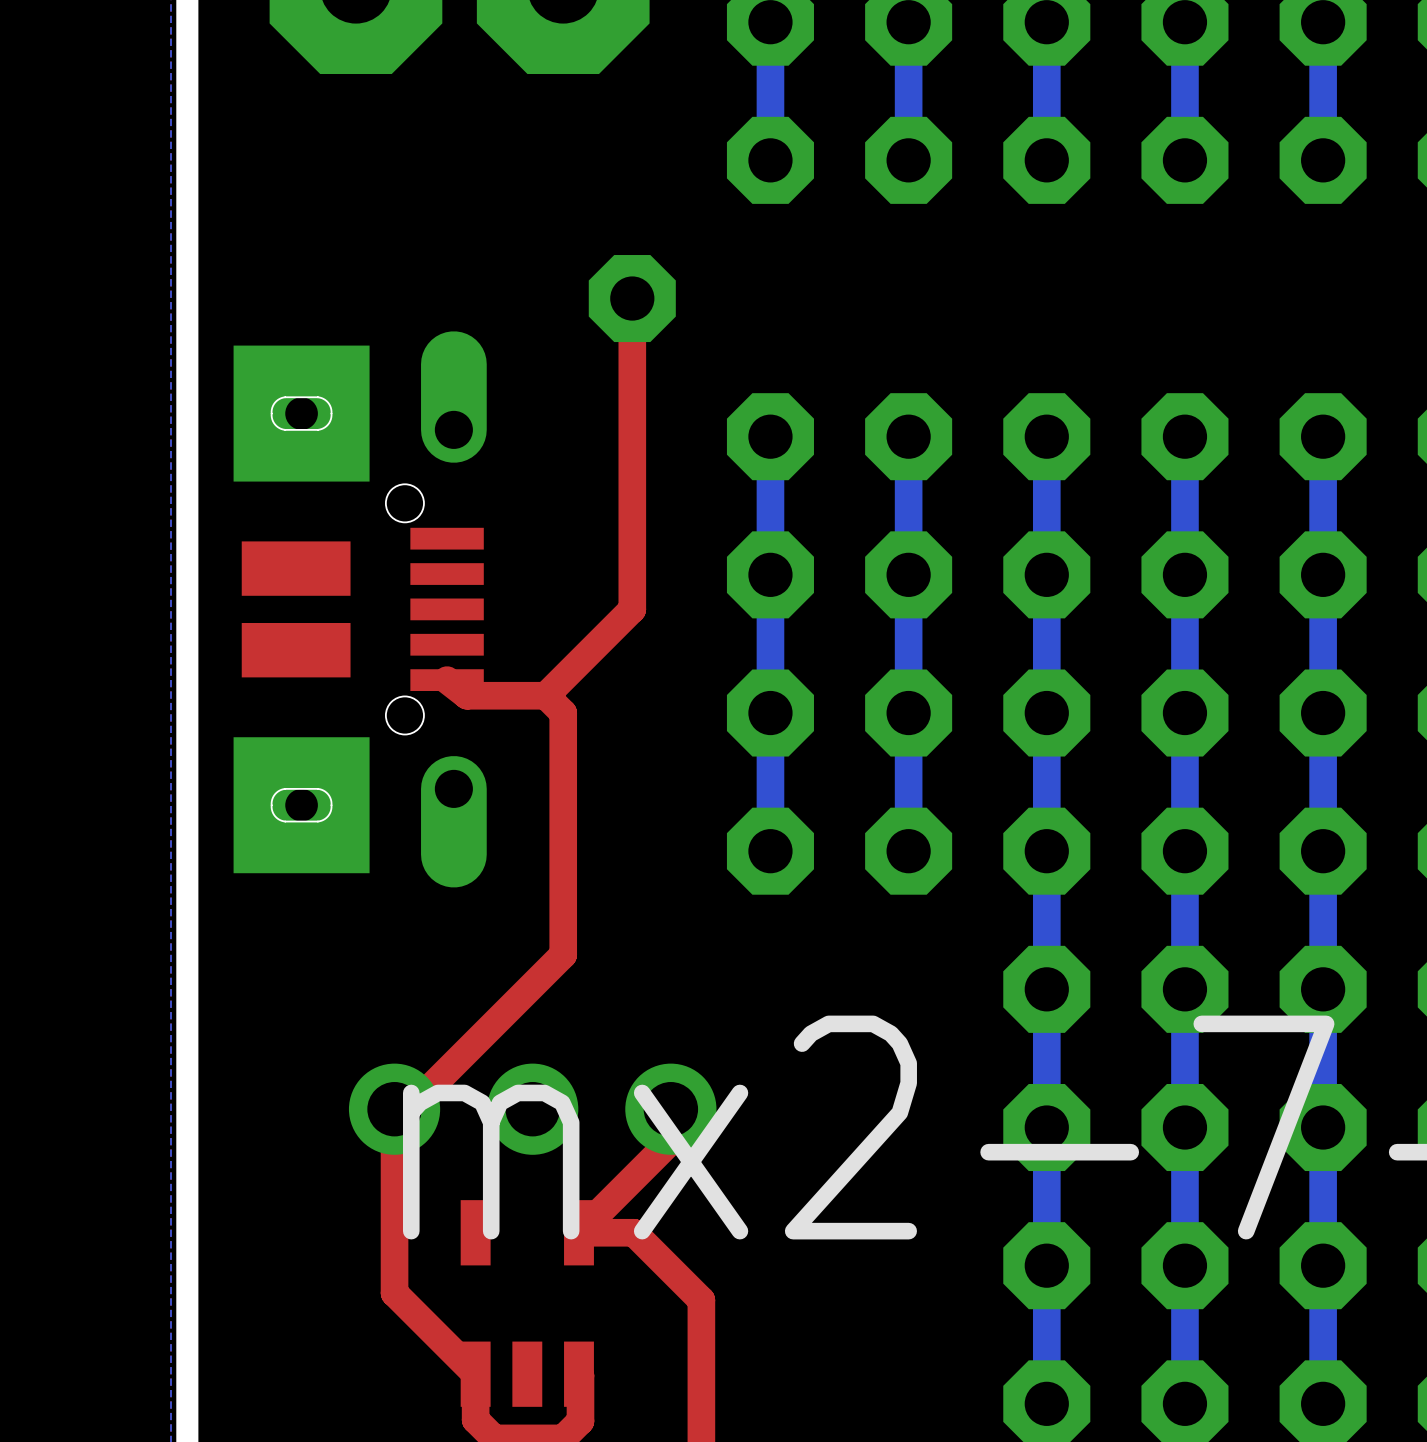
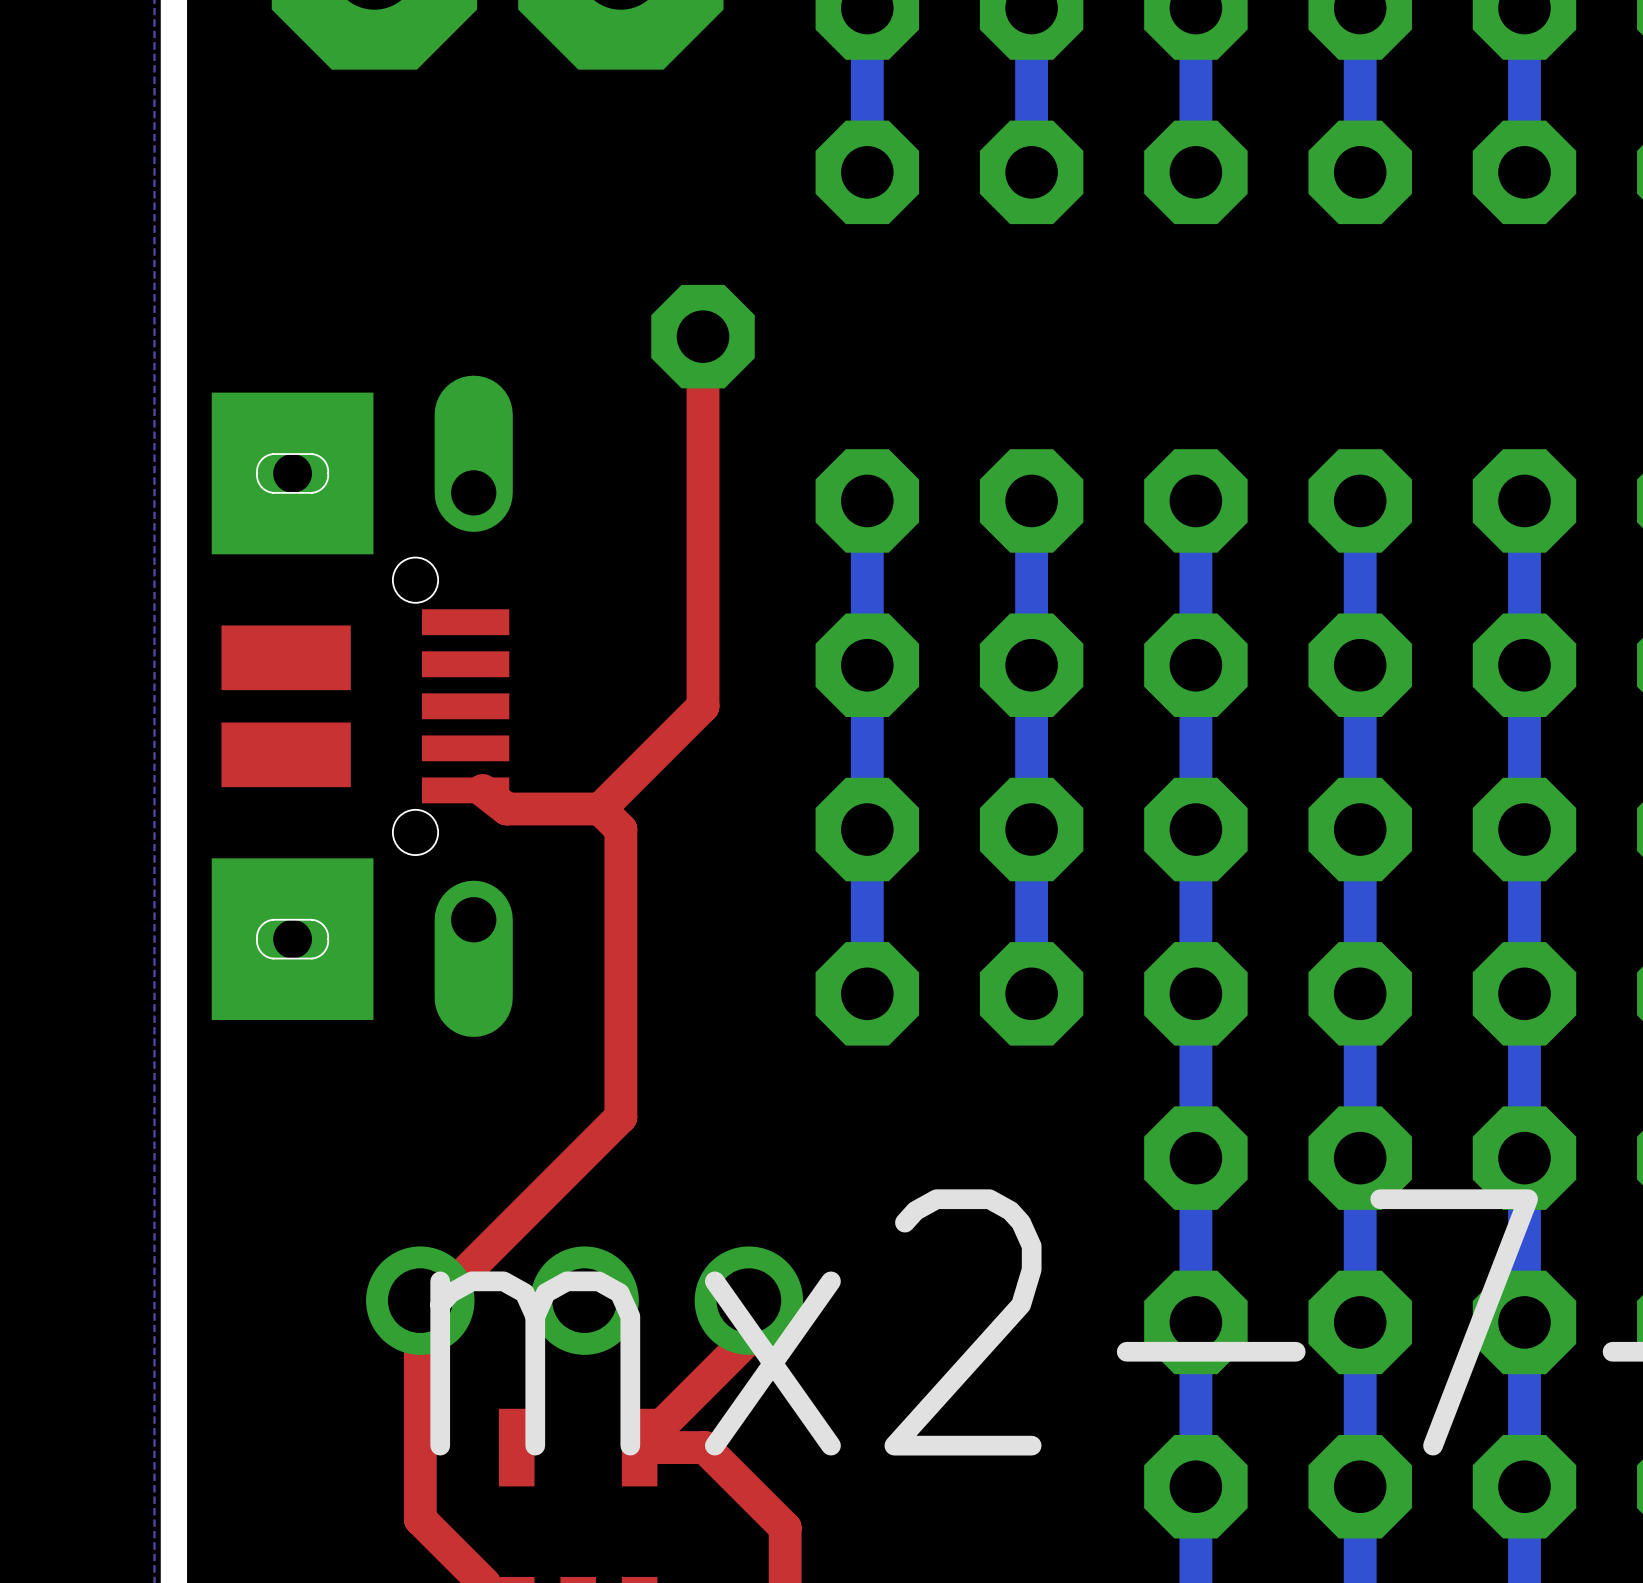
part position: (360, 609) -> (362, 706)

